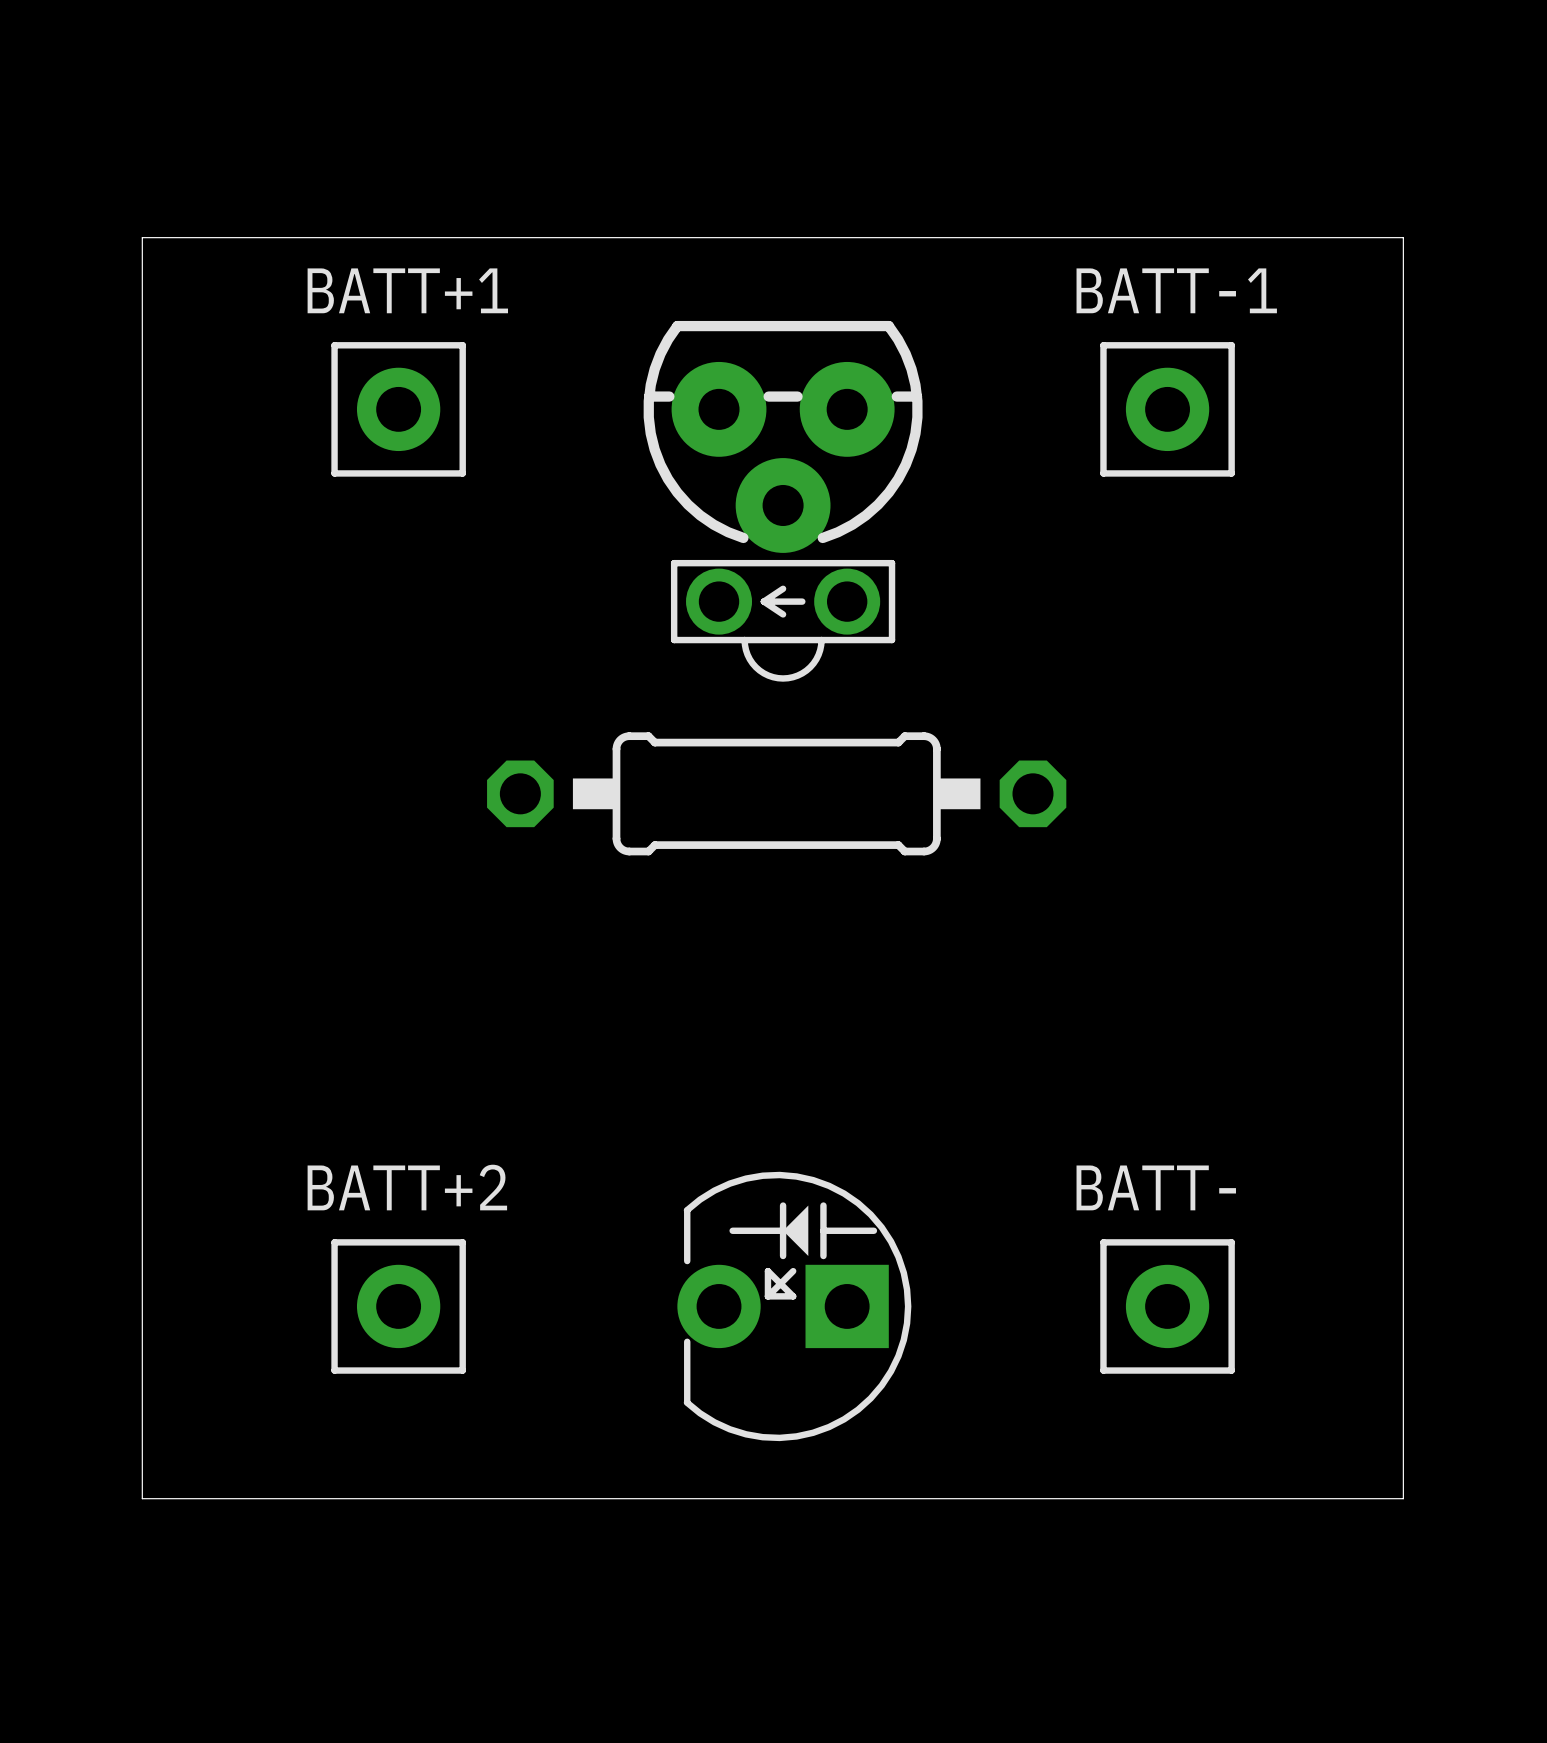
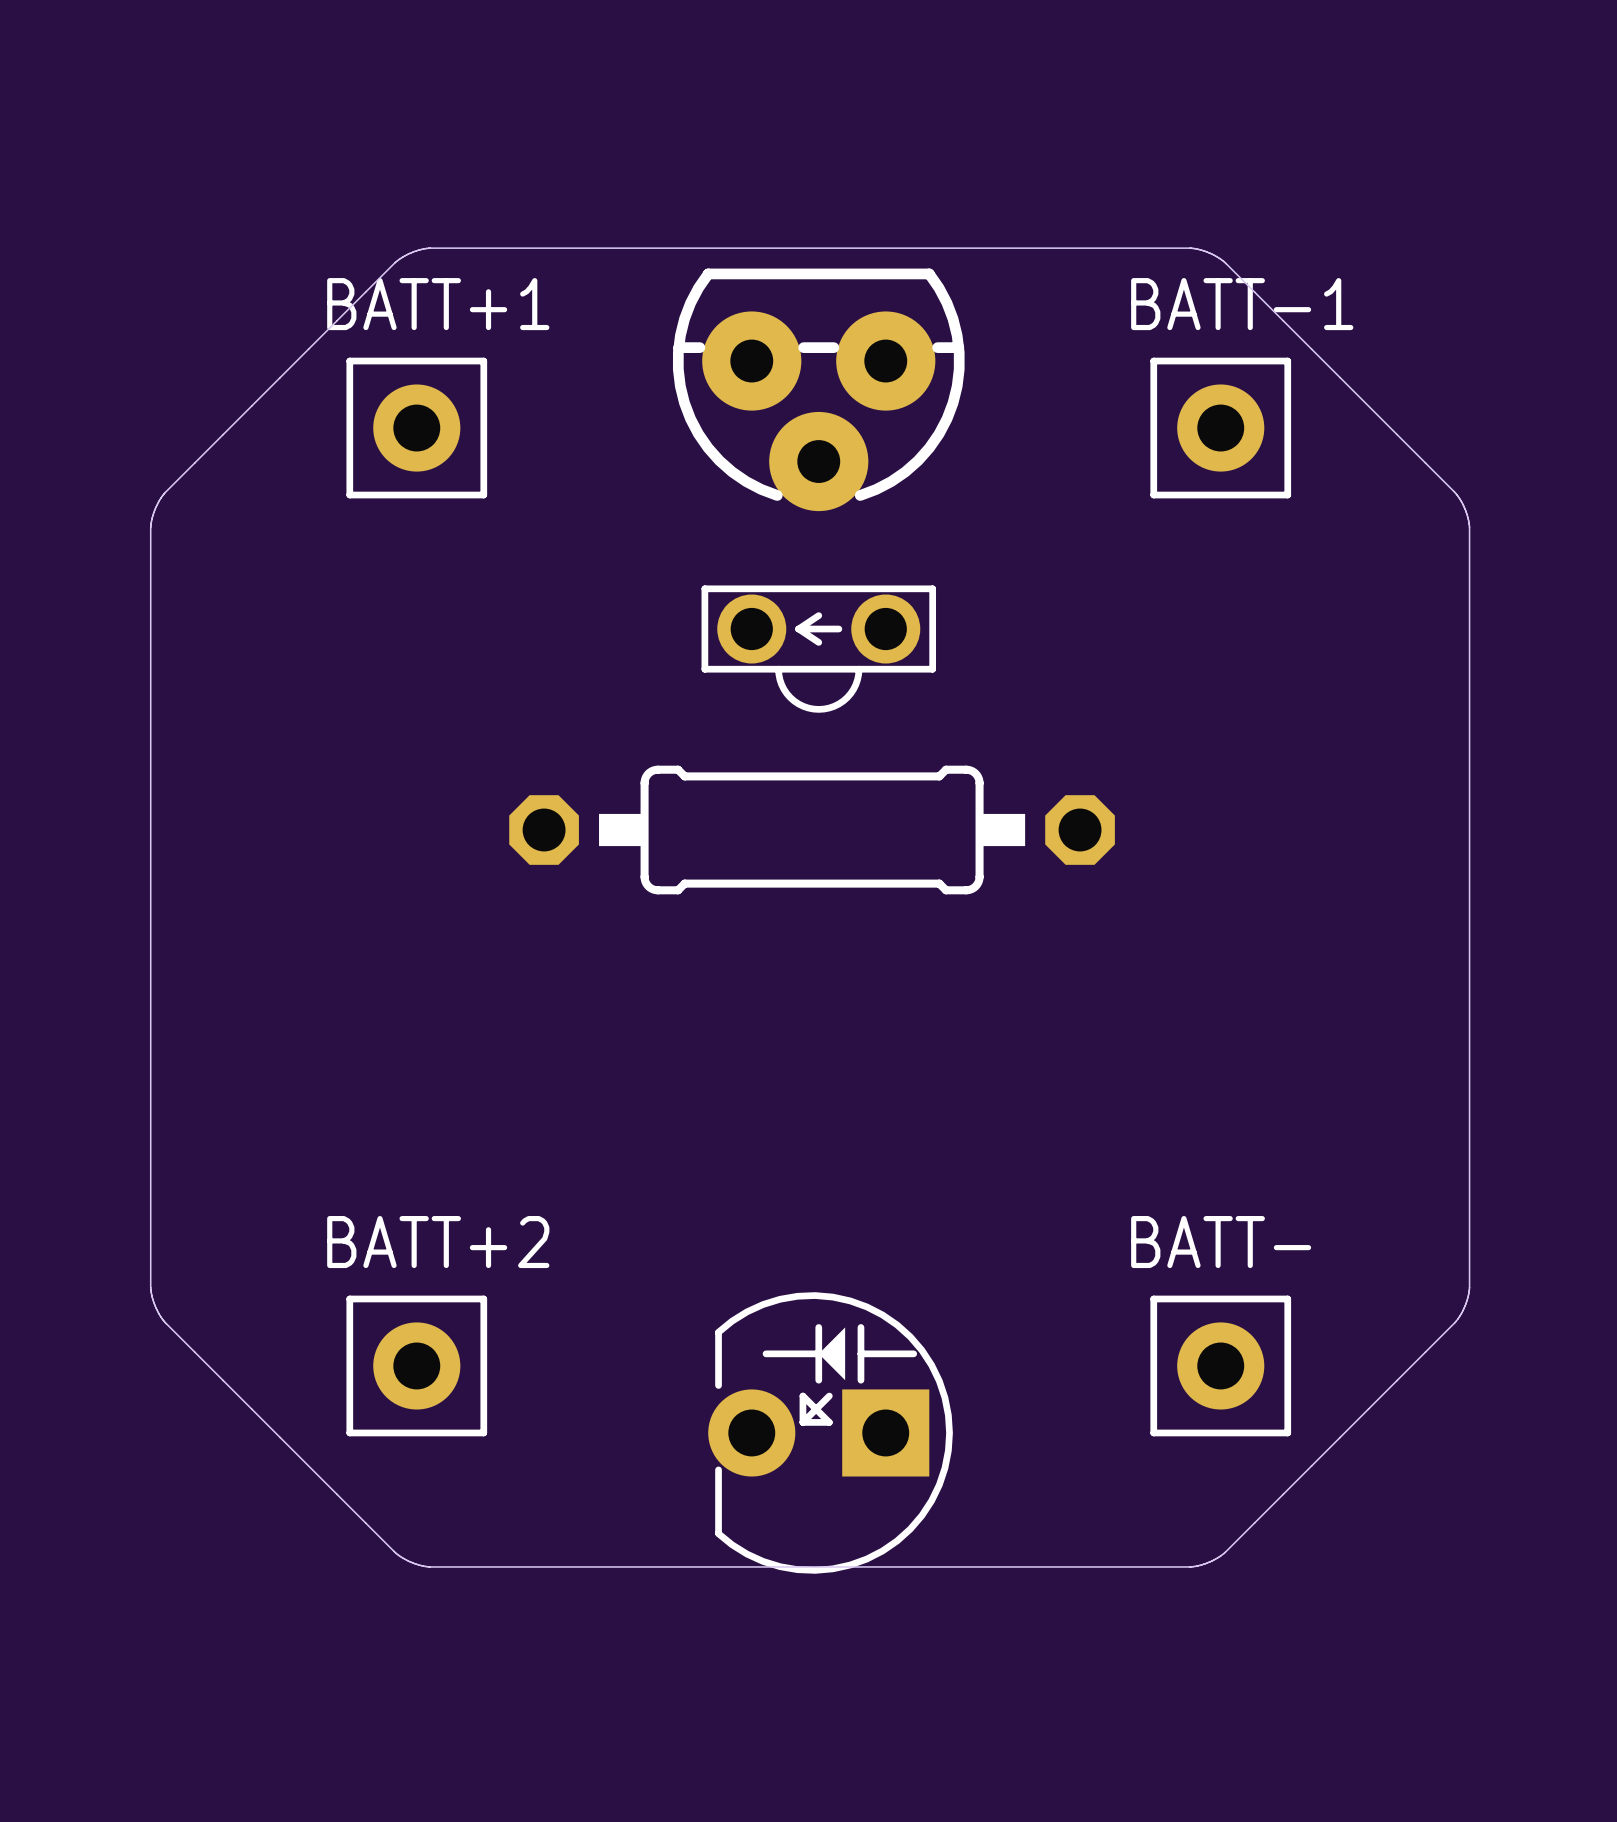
part position: (783, 436) -> (818, 389)
part position: (794, 1306) -> (830, 1432)
board edge: (411, 1498) (142, 1498) (142, 237) (1403, 237) (1403, 1498) (1138, 1498) -> (430, 1566) (409, 1561) (395, 1552) (165, 1322) (154, 1304) (150, 1287) (150, 527) (152, 517) (158, 502) (165, 492) (395, 262) (413, 252) (430, 248) (1190, 248) (1200, 249) (1215, 255) (1225, 262) (1455, 492) (1460, 500) (1467, 515) (1469, 527) (1469, 1287) (1467, 1297) (1461, 1312) (1455, 1322) (1225, 1552) (1210, 1561) (1190, 1566)

